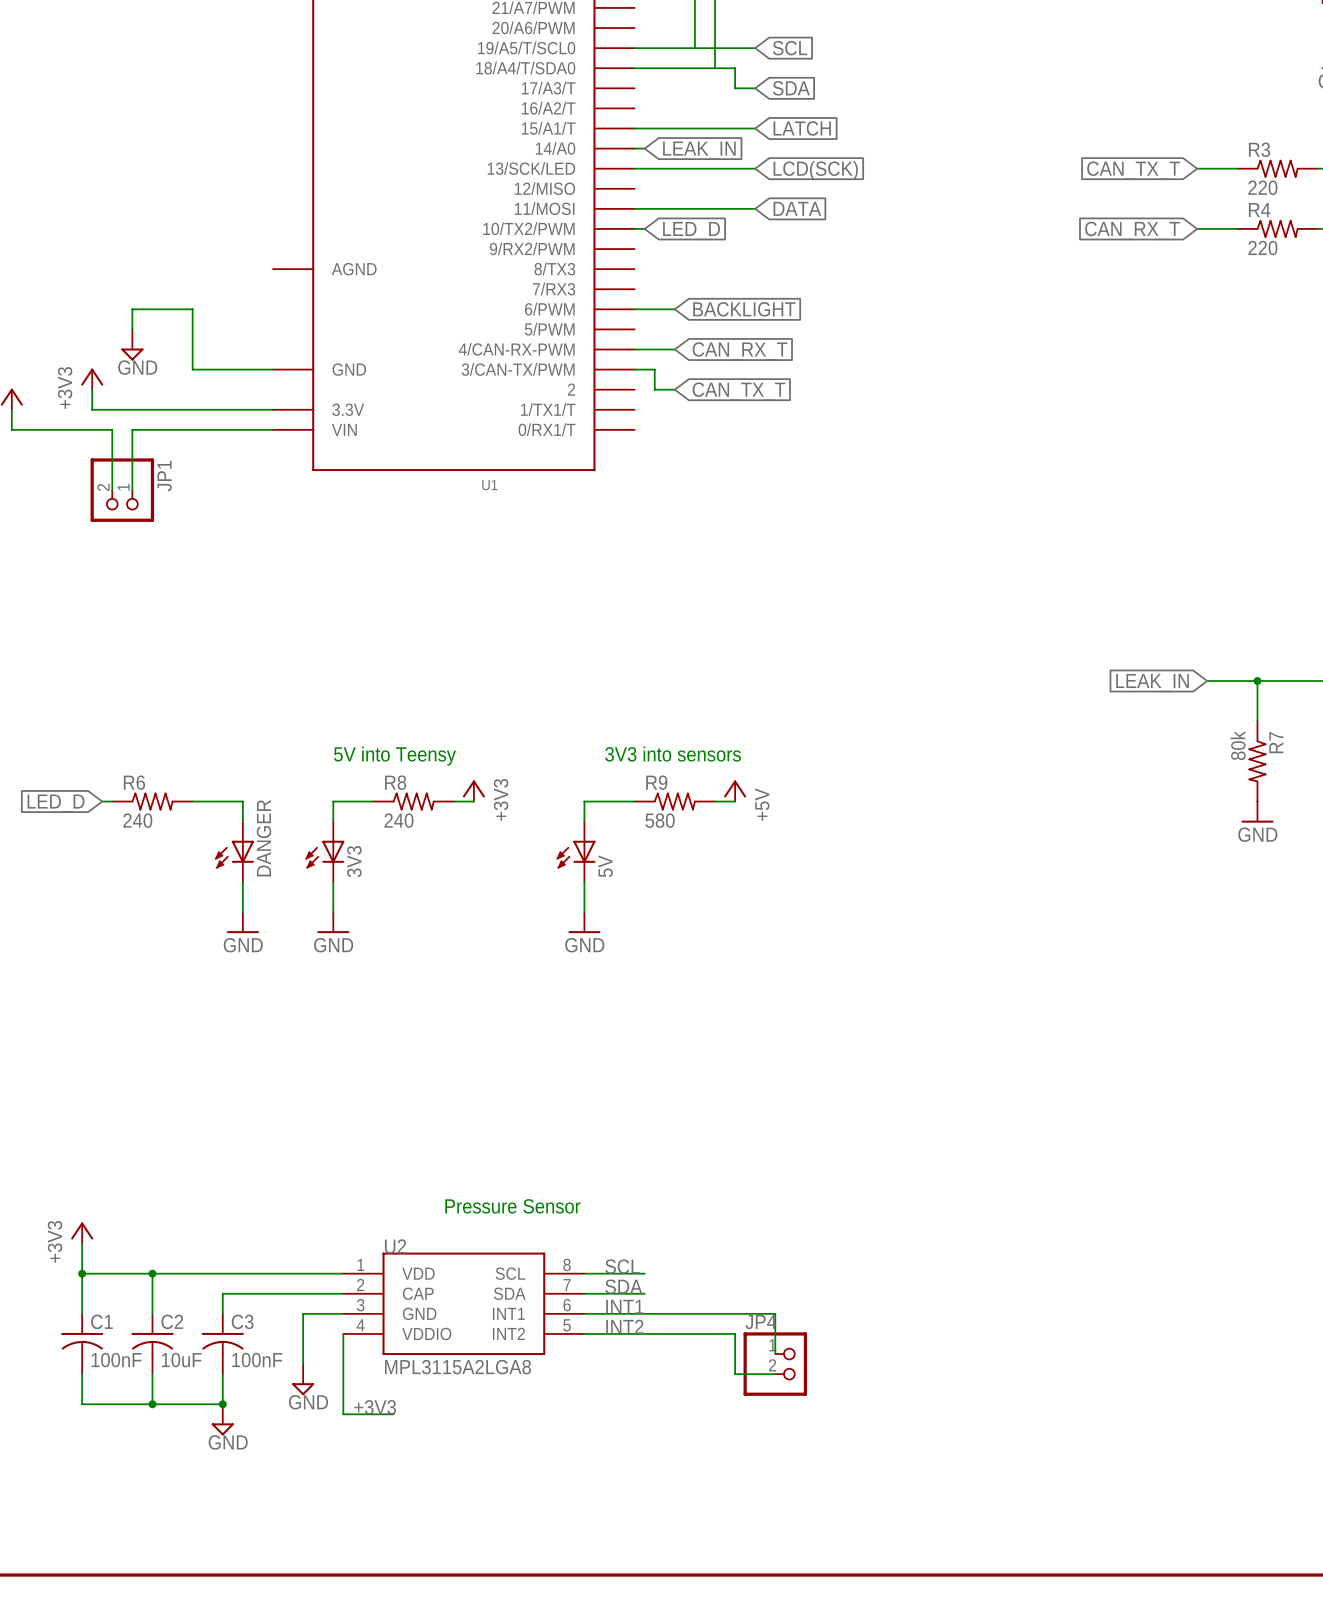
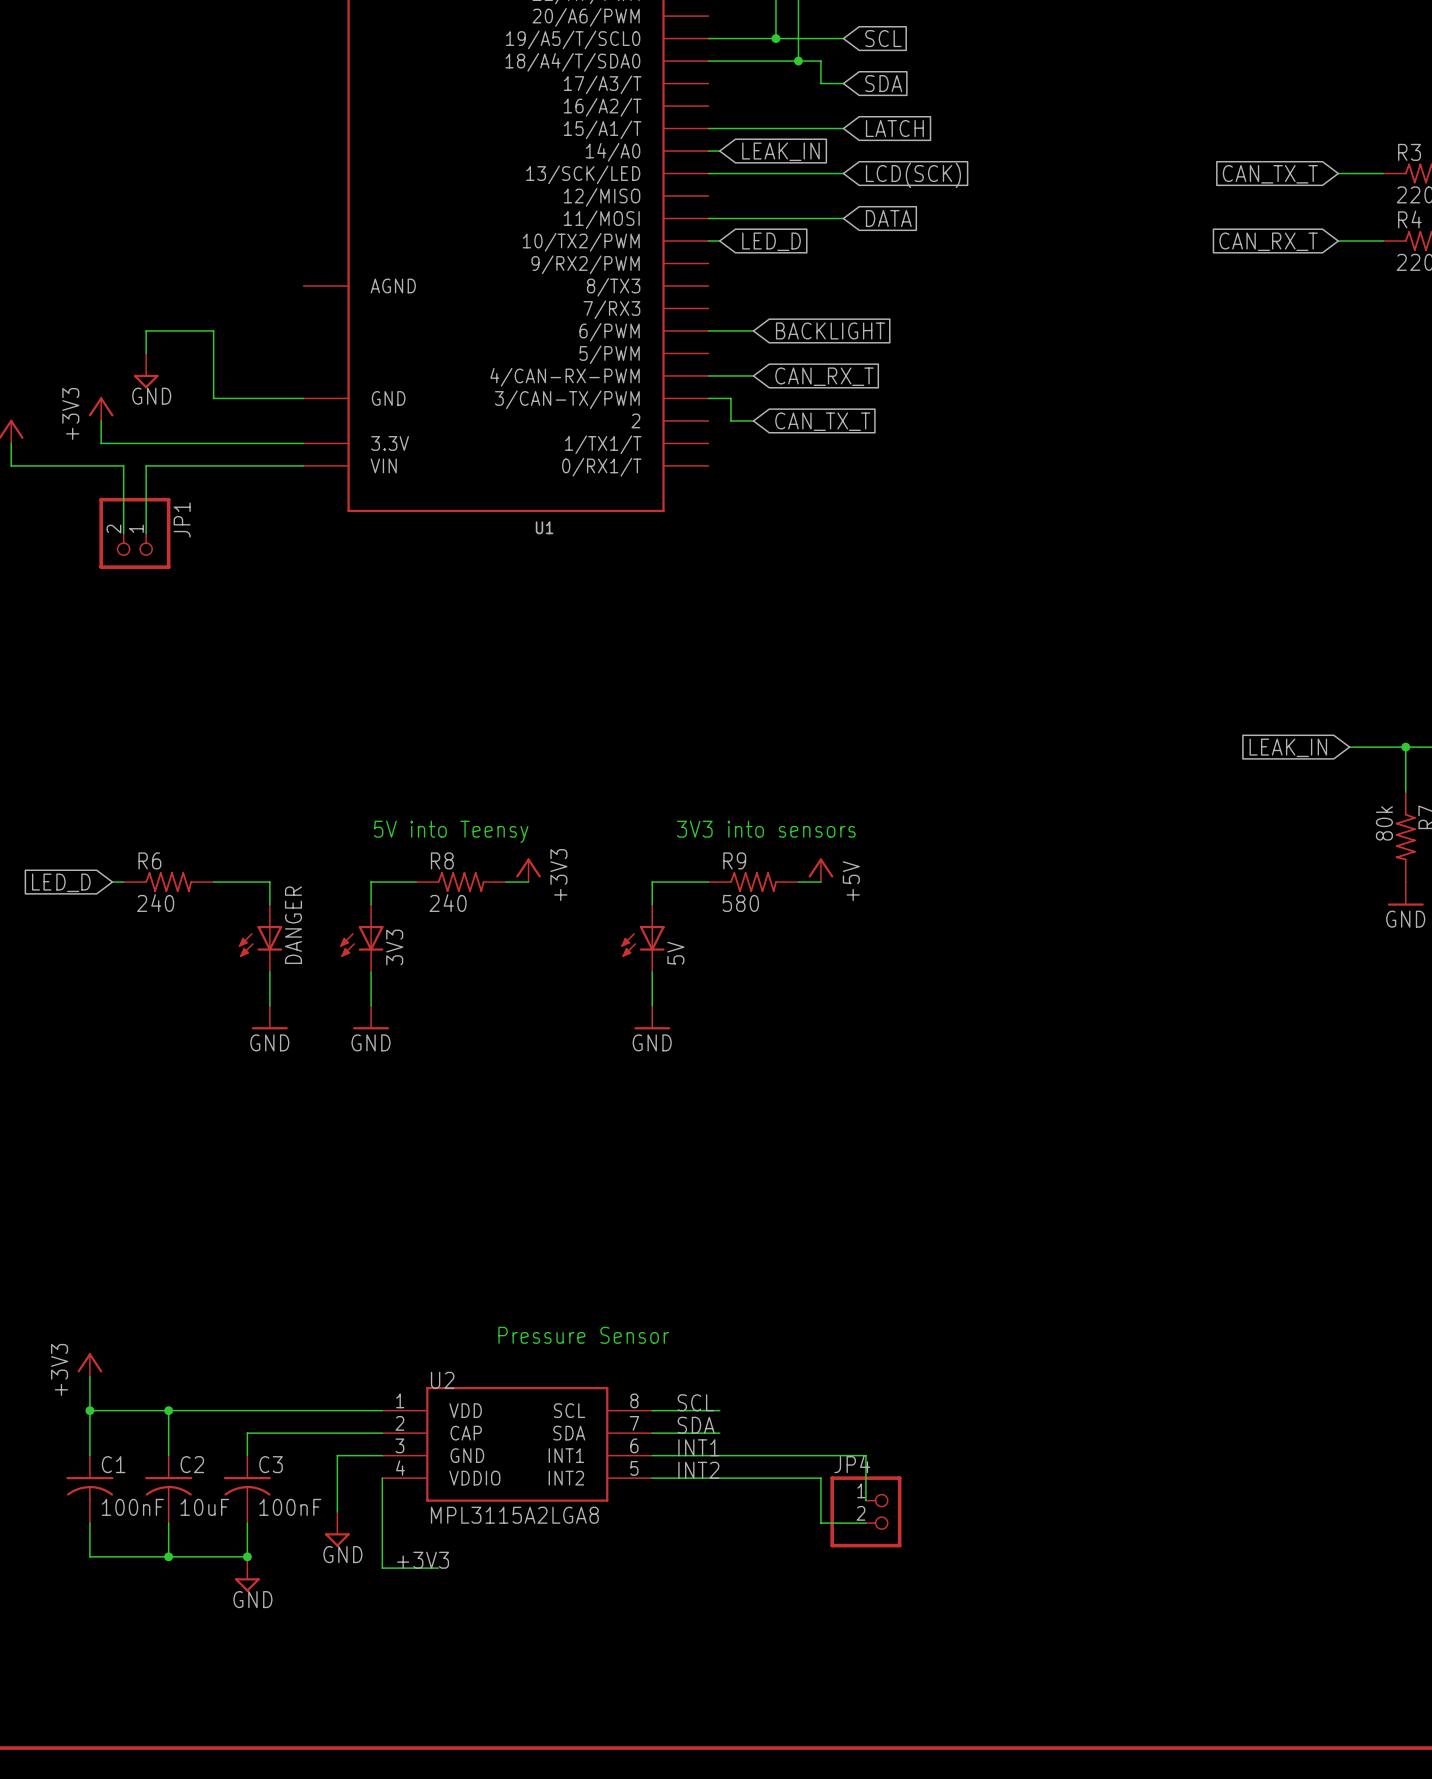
junction: none -> (775, 38)
junction: none -> (798, 61)

